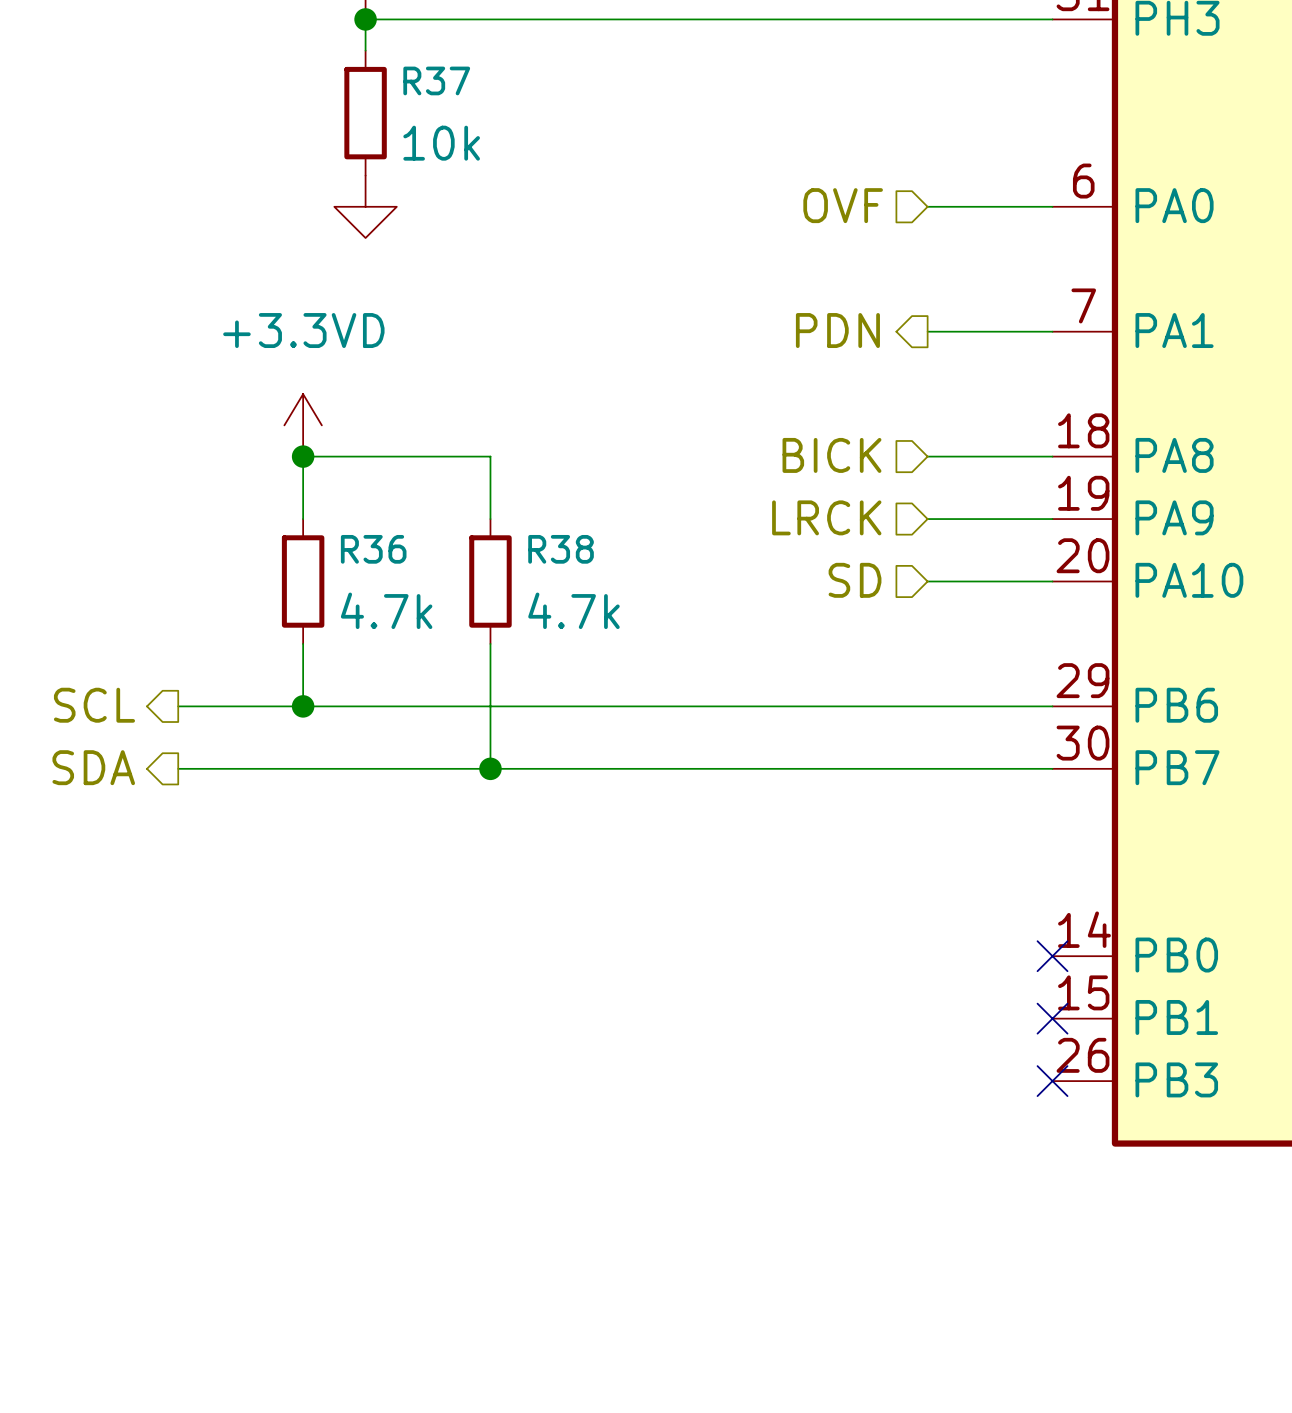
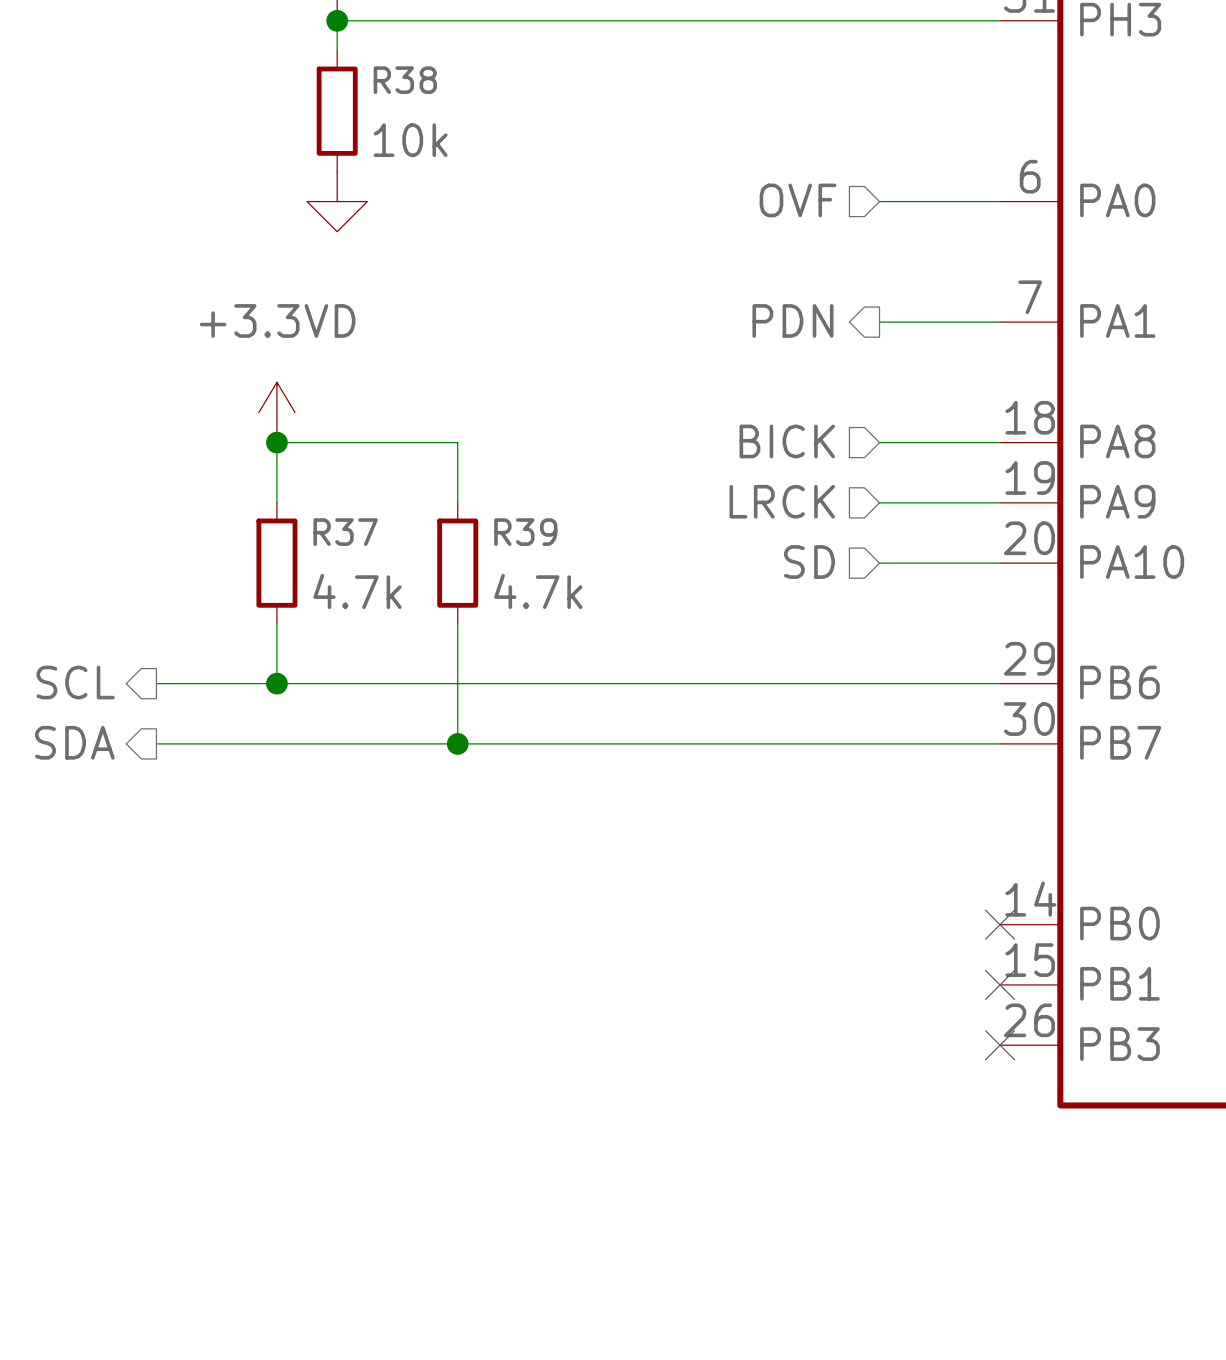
R37 name: R37 (436, 80) -> R38 (405, 80)
R36 name: R36 (373, 549) -> R37 (345, 532)
R38 name: R38 (561, 549) -> R39 (525, 532)

